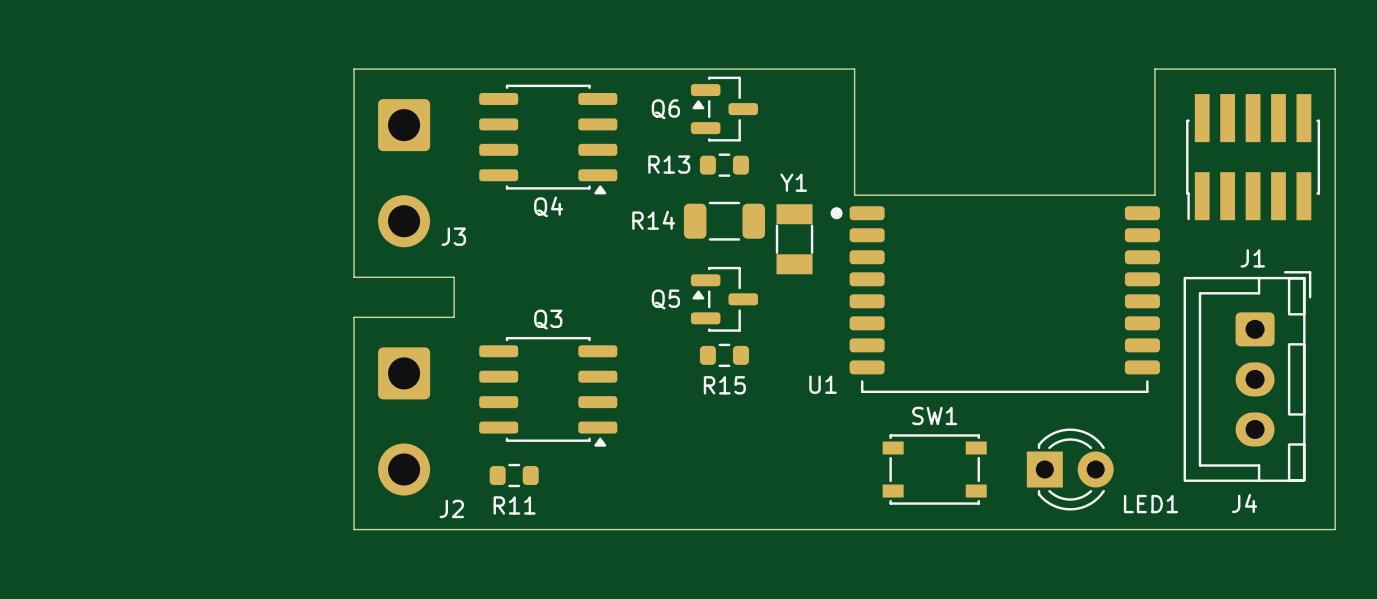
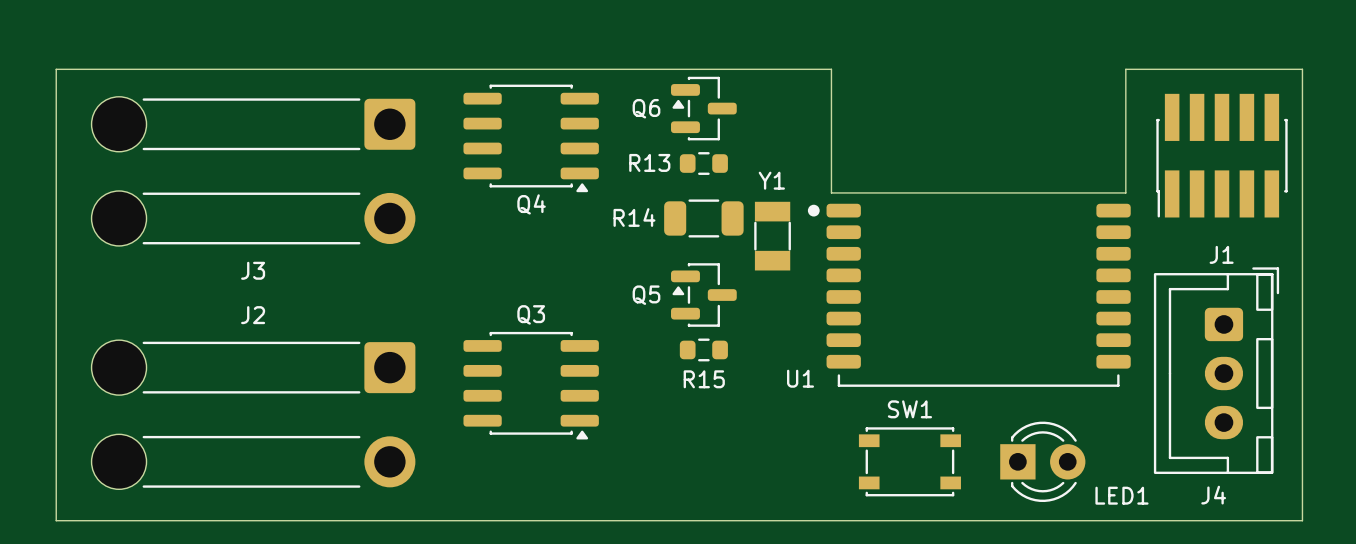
board edge: (354, 69) (354, 277) (454, 277) (454, 317) (354, 317) (354, 529) -> (340, 69) (56, 69) (56, 520) (340, 520)
J3 footprint: [378, 99, 431, 248] -> [91, 96, 416, 246]
J3 name position: J3 (453, 236) -> J3 (253, 270)
J2 footprint: [378, 347, 431, 496] -> [91, 340, 416, 490]
R11: (514, 475) -> none
J2 name position: J2 (451, 508) -> J2 (253, 315)

